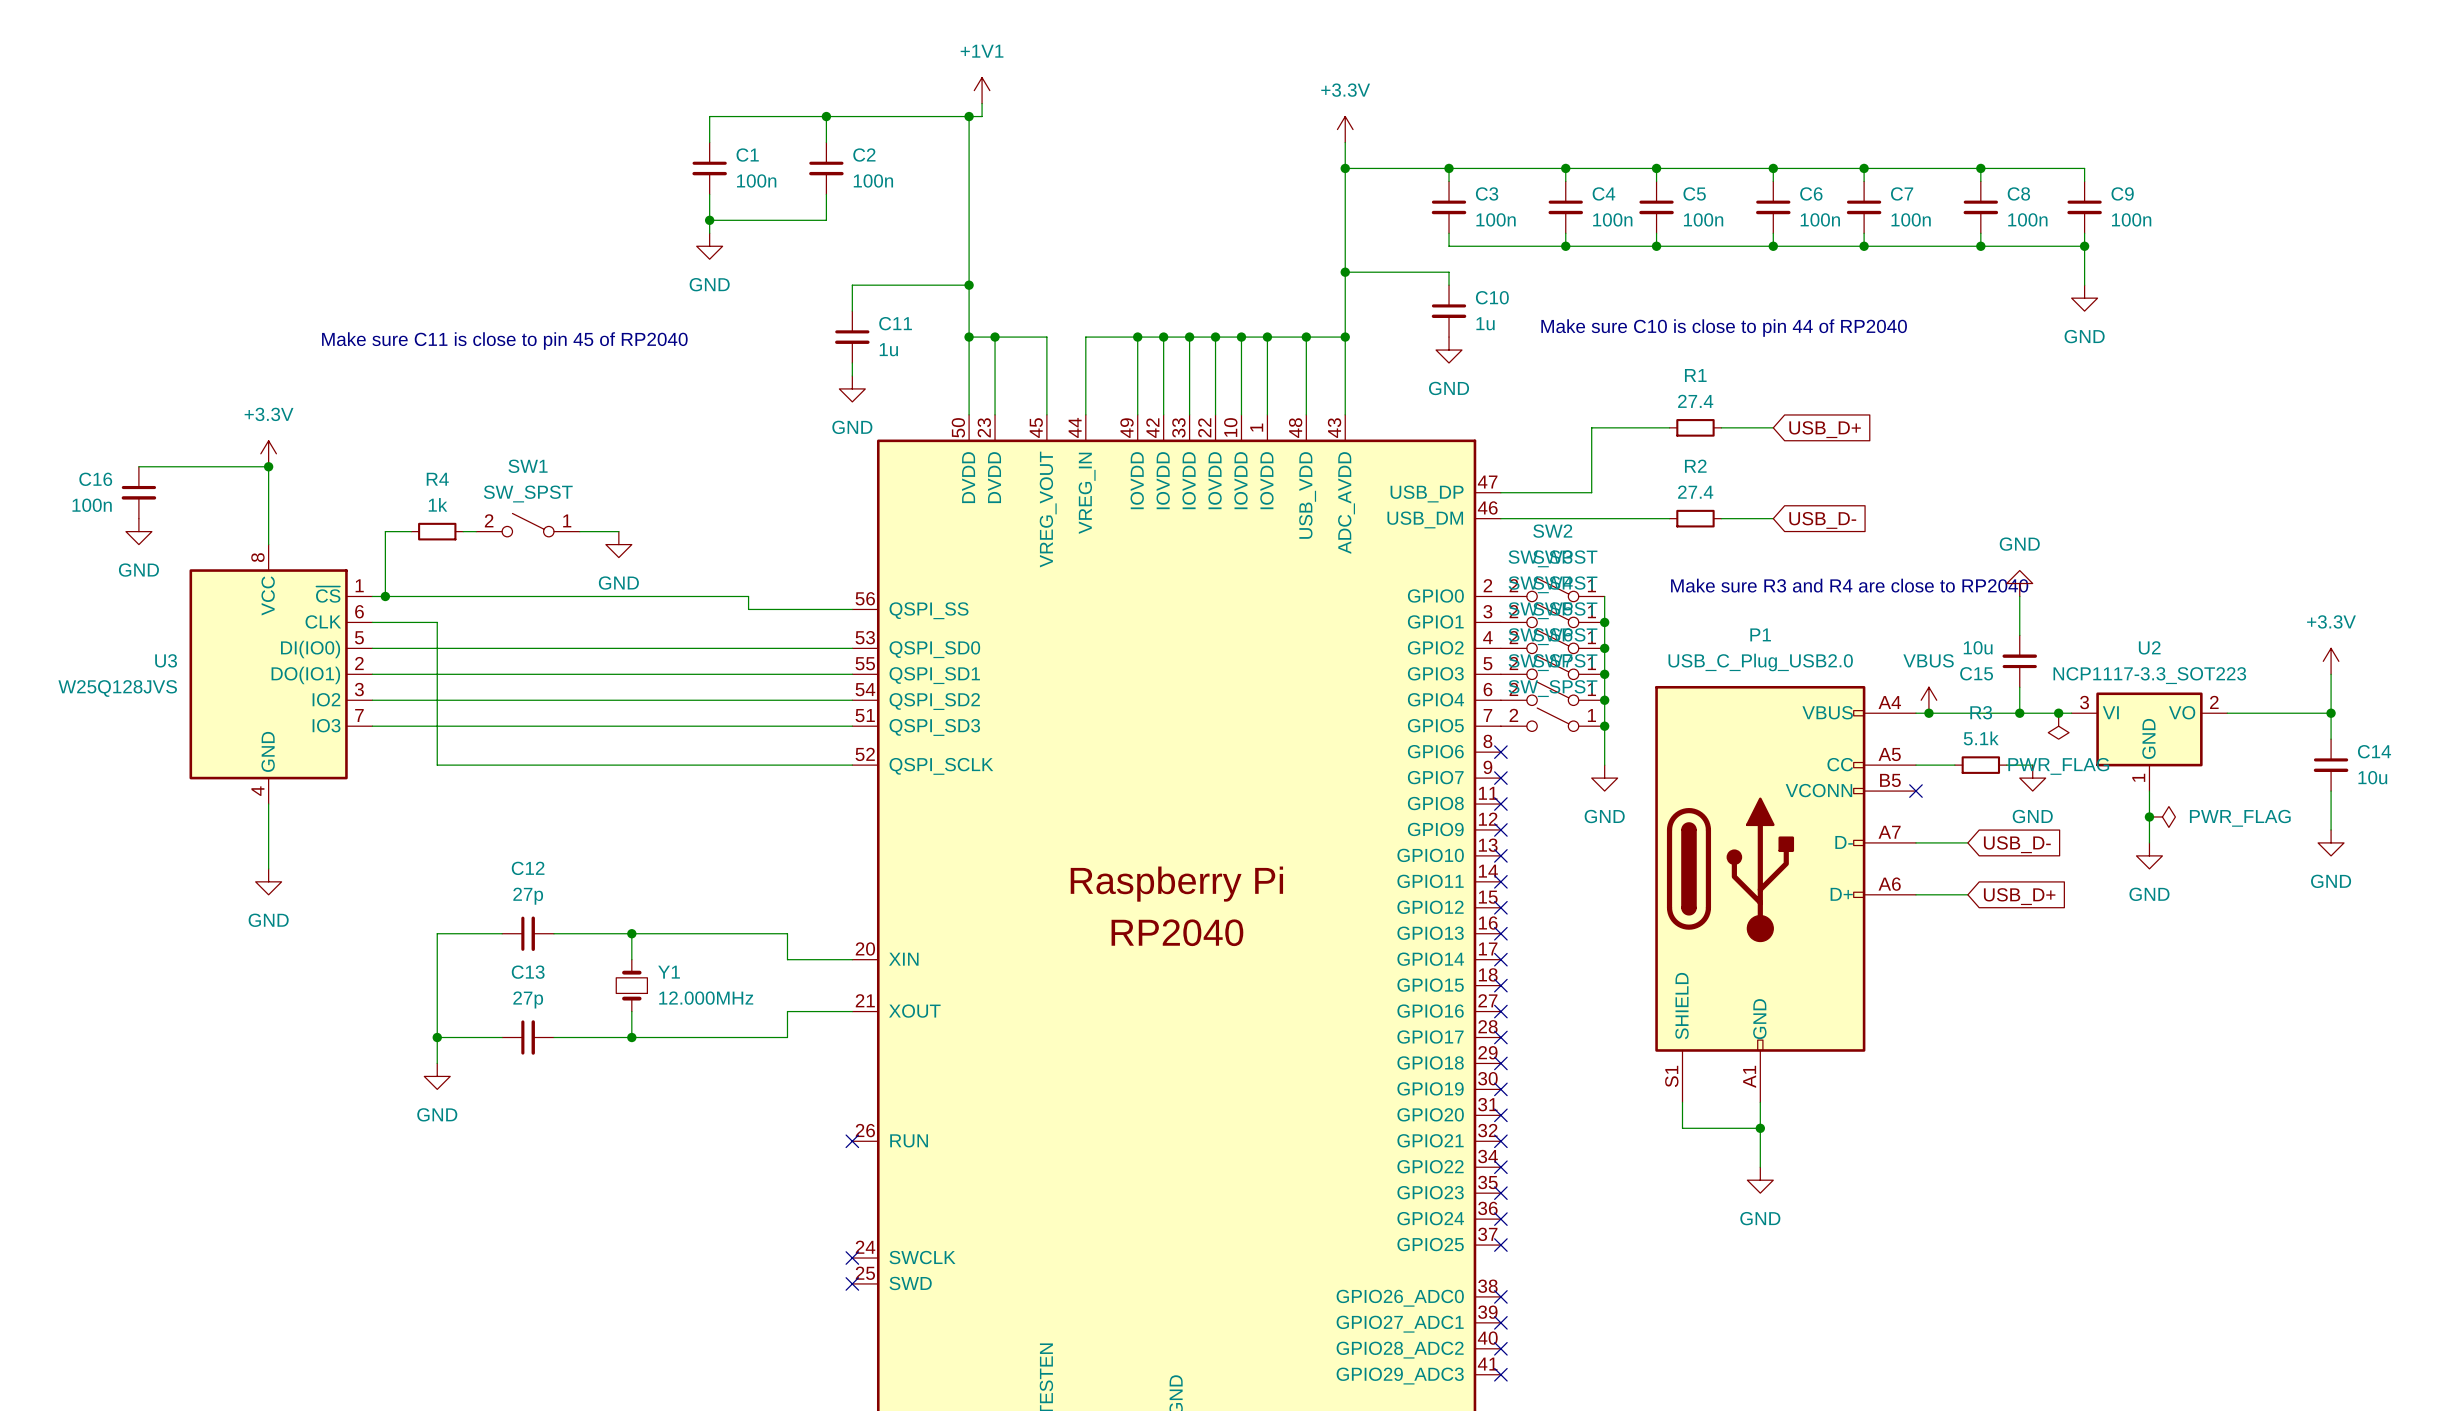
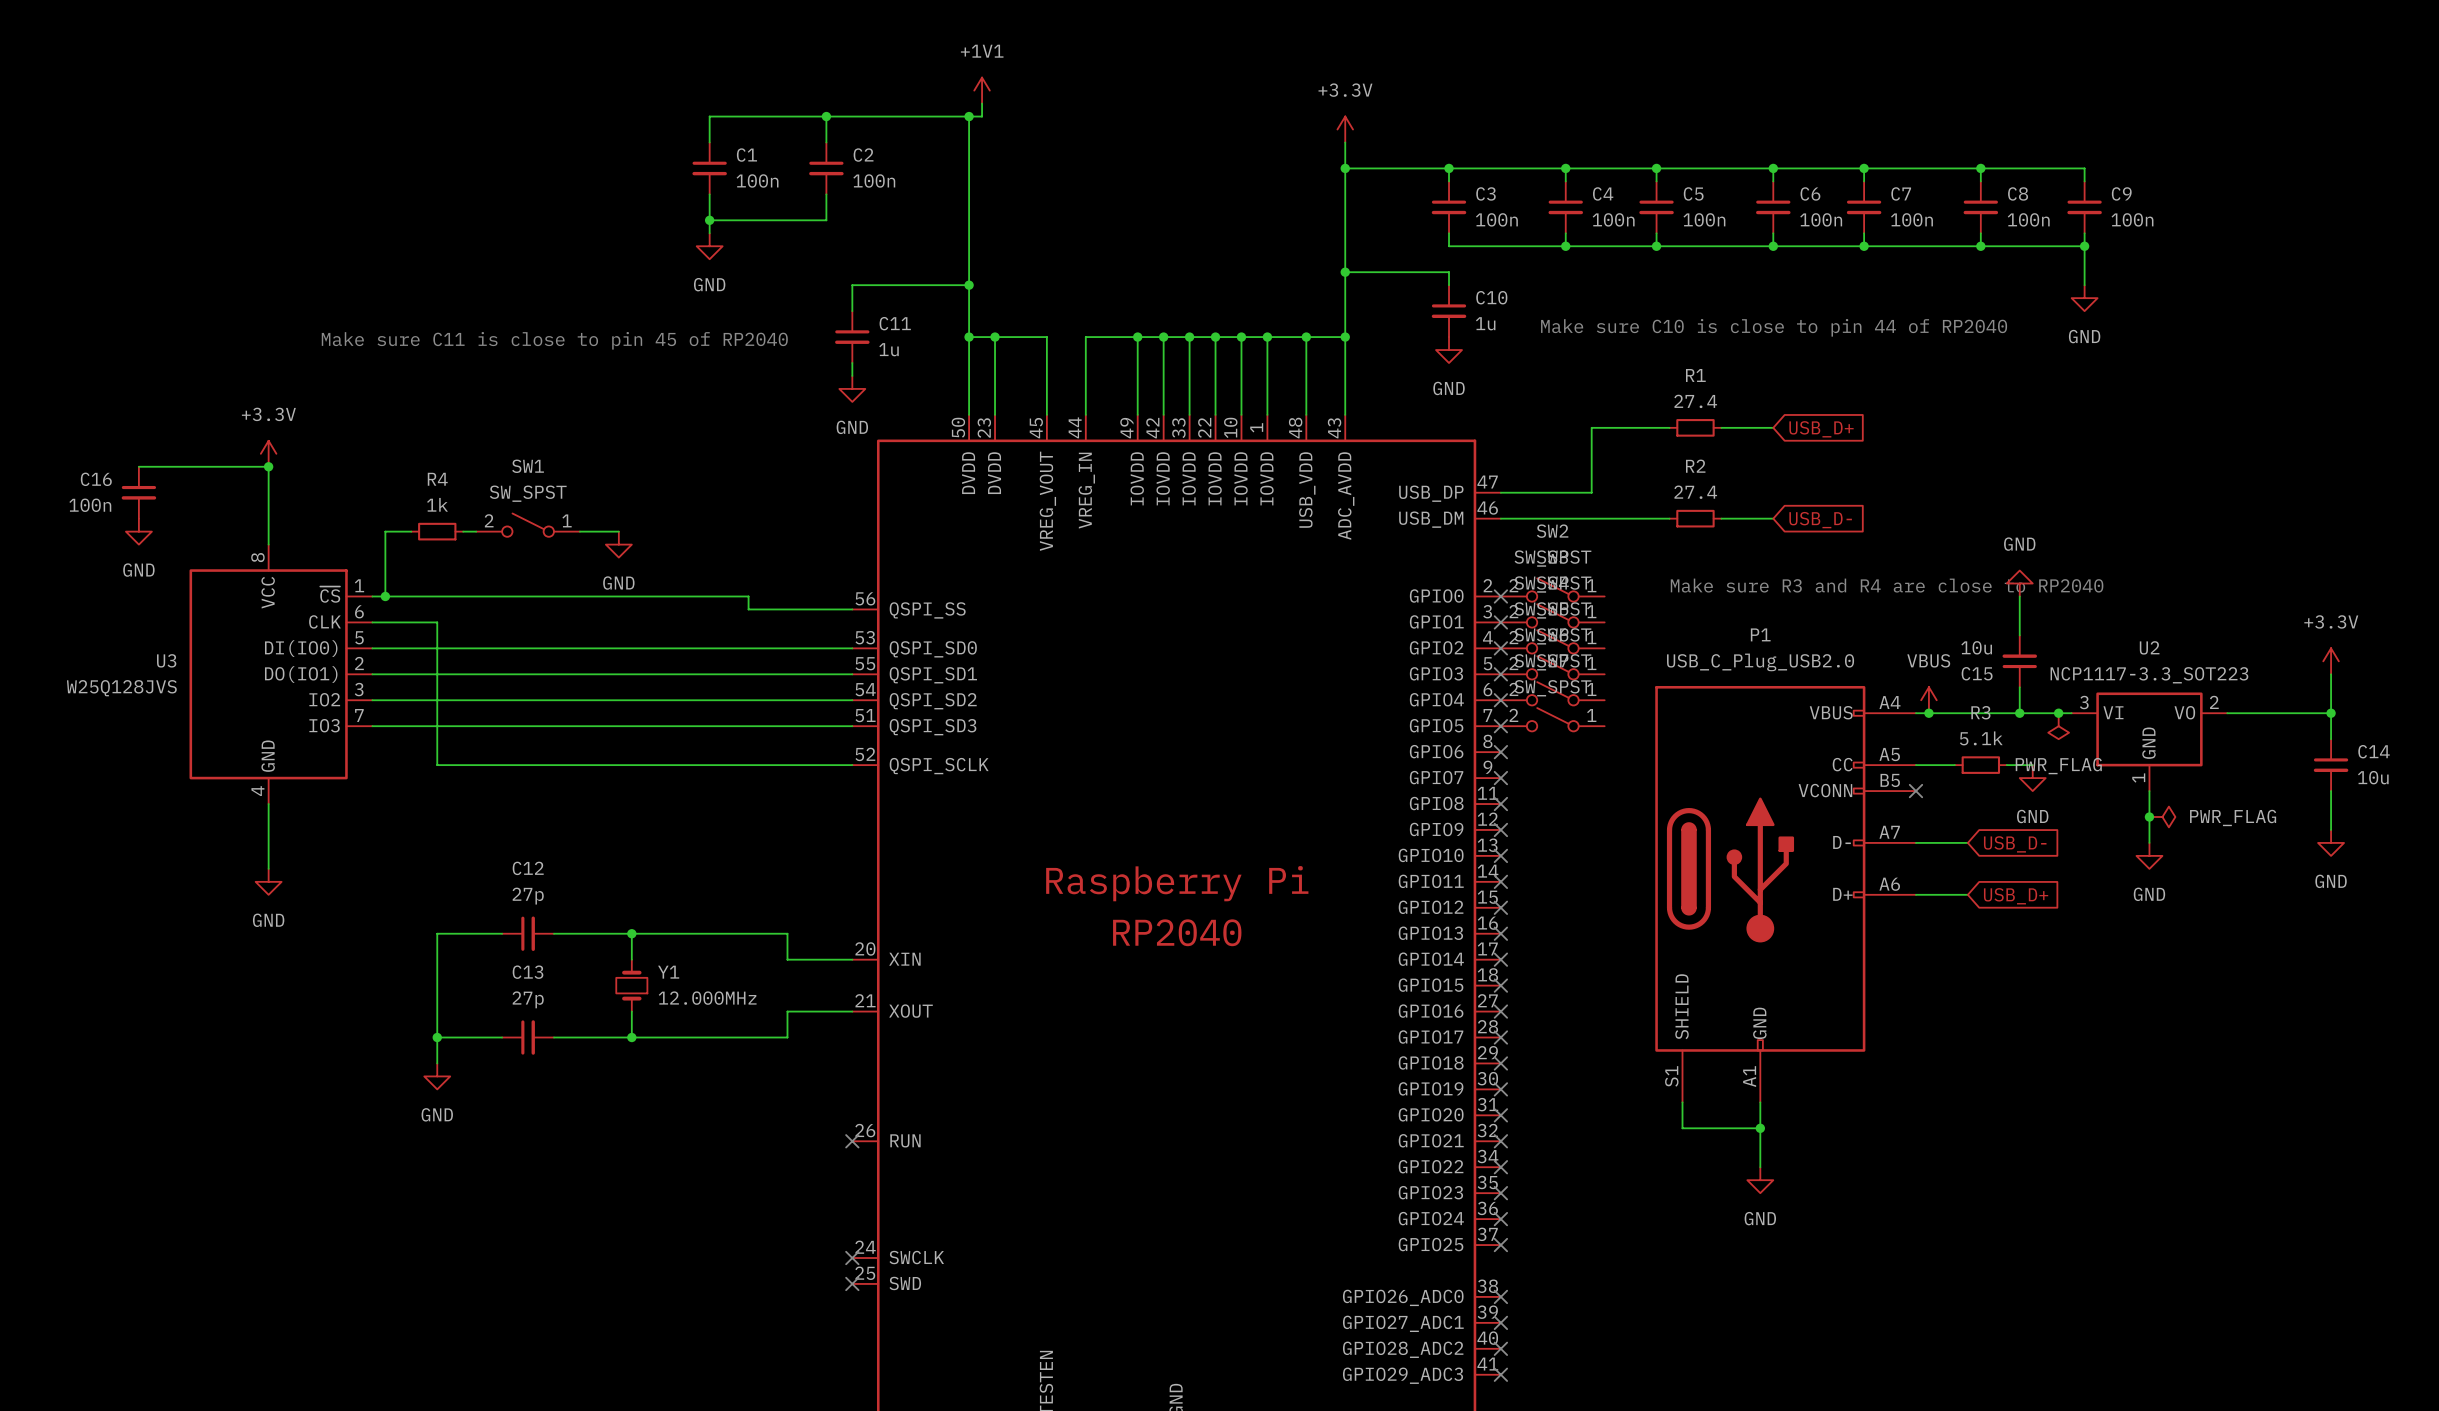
no-connect mark: none -> (1500, 596)
wire: (1604, 596) (1604, 765) -> none
no-connect mark: none -> (1500, 622)
junction: (1604, 622) -> none
no-connect mark: none -> (1500, 648)
junction: (1604, 648) -> none
no-connect mark: none -> (1500, 674)
junction: (1604, 674) -> none
no-connect mark: none -> (1500, 700)
junction: (1604, 700) -> none
no-connect mark: none -> (1500, 726)
junction: (1604, 726) -> none
power symbol: GND (1604, 778) -> none

